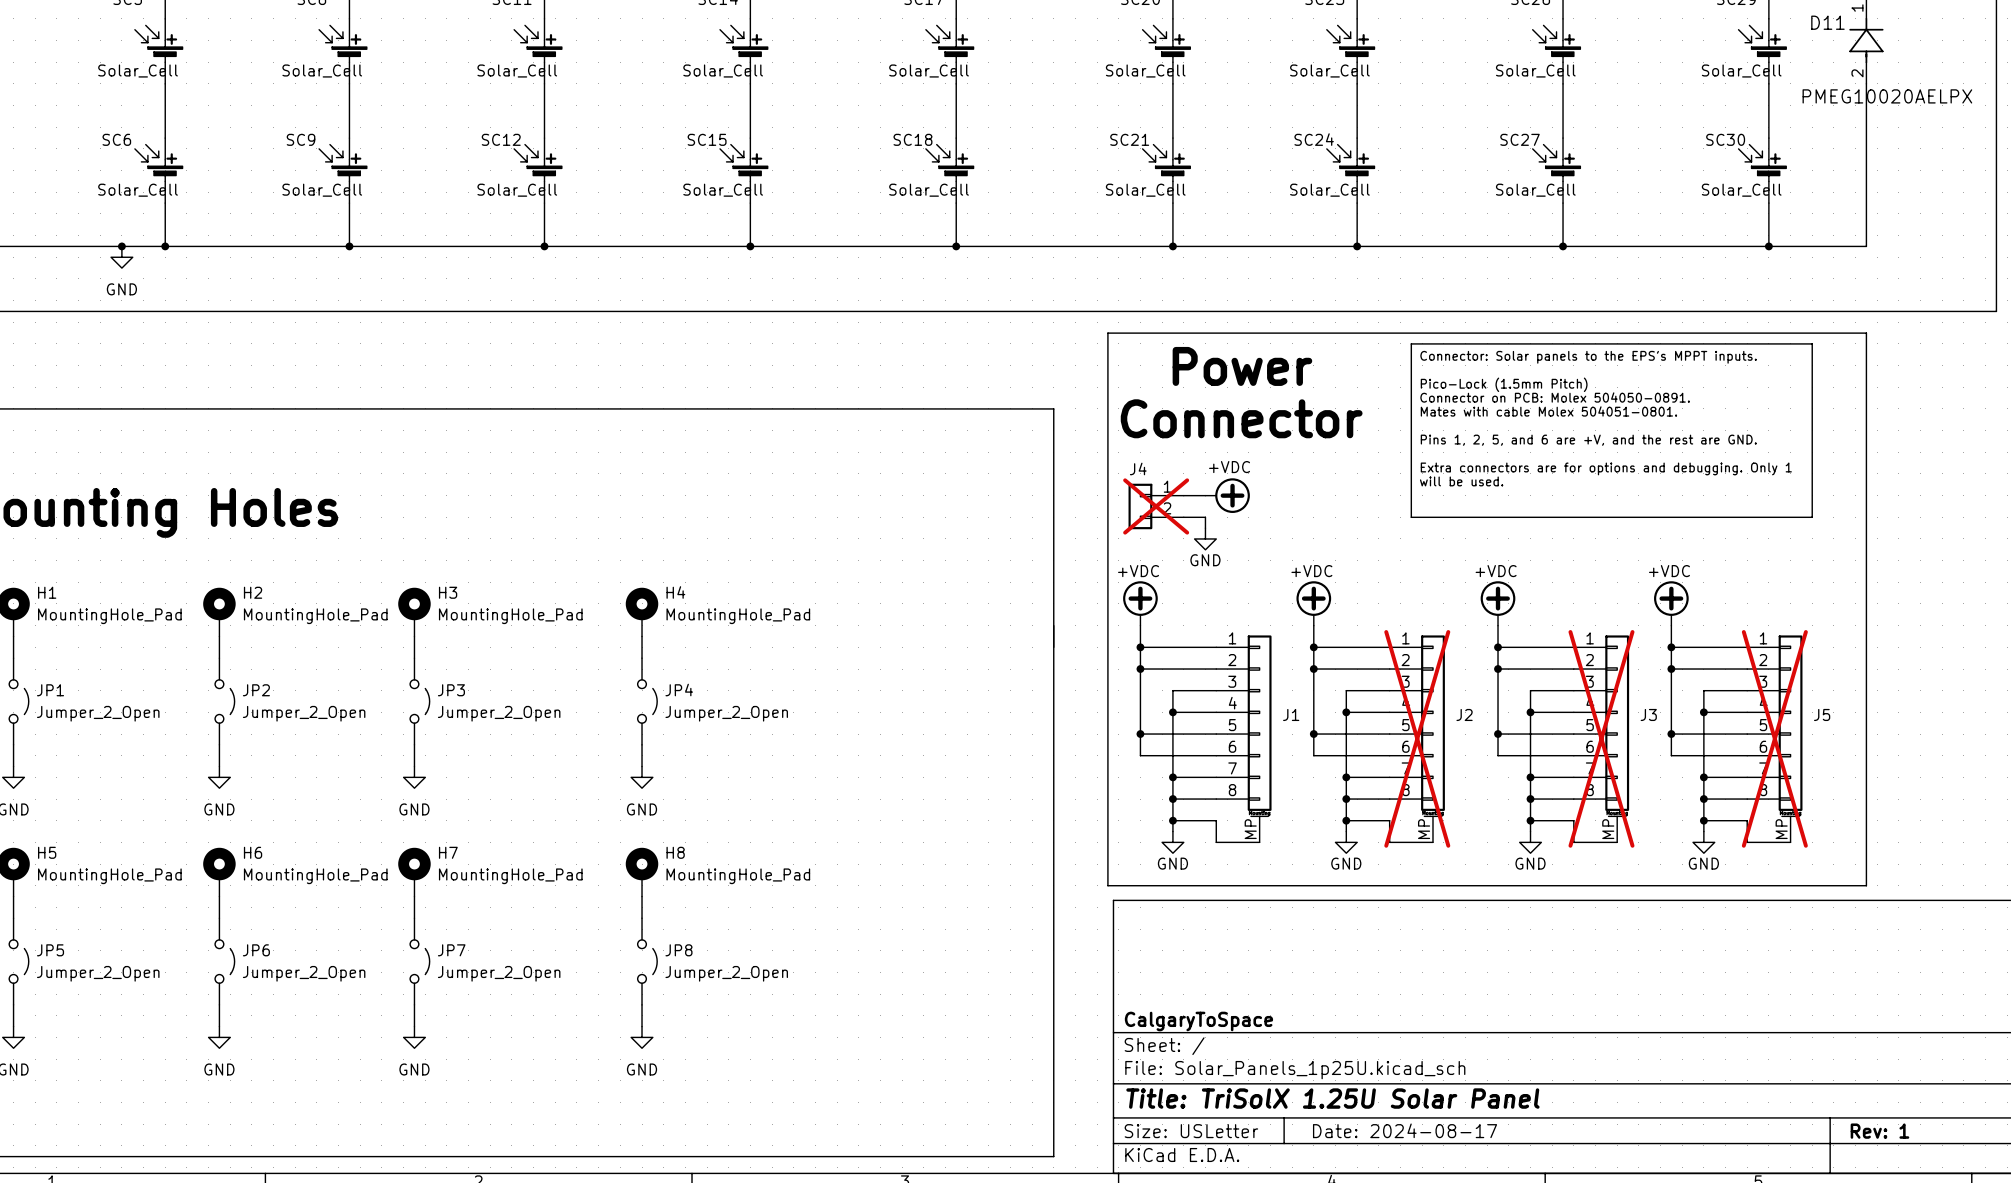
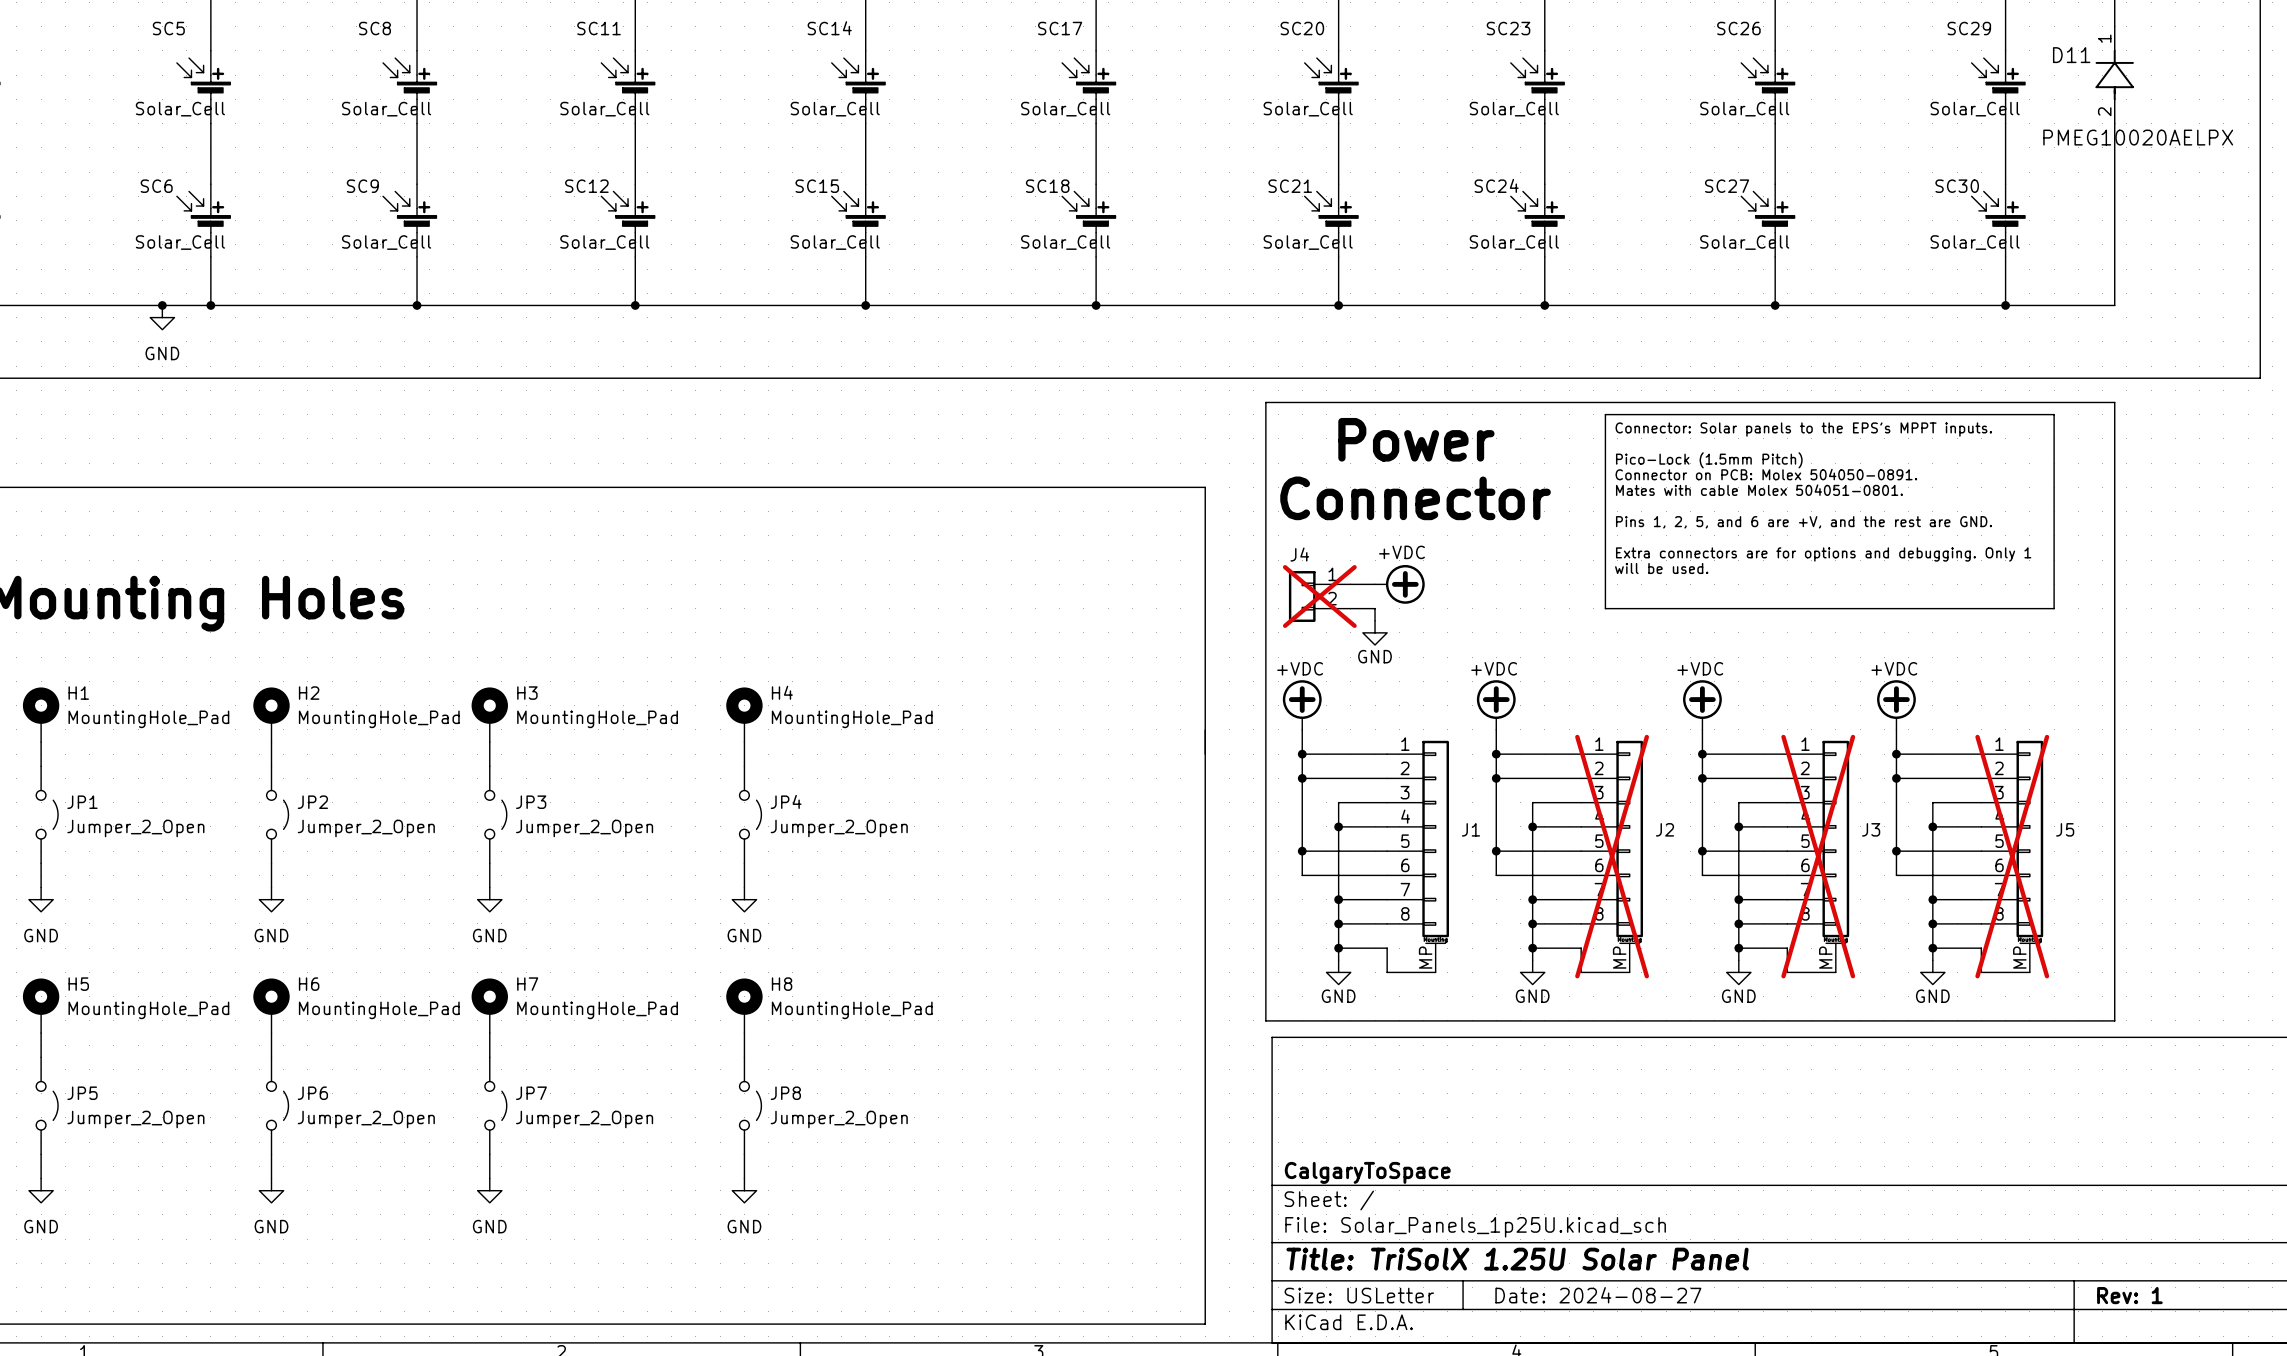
title block: Date: 2024-08-17 (1405, 1130) -> Date: 2024-08-27 (1598, 1295)

